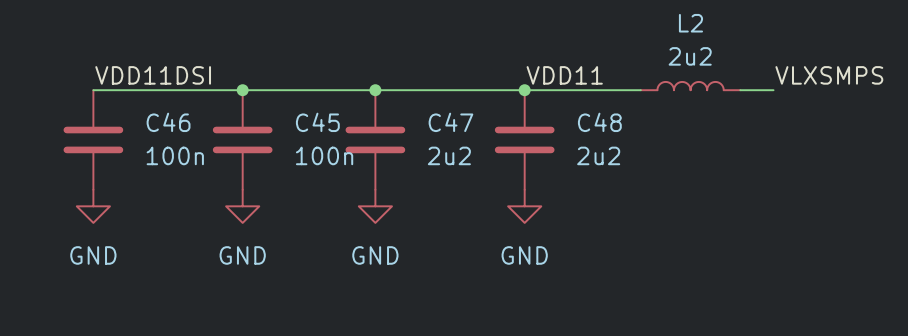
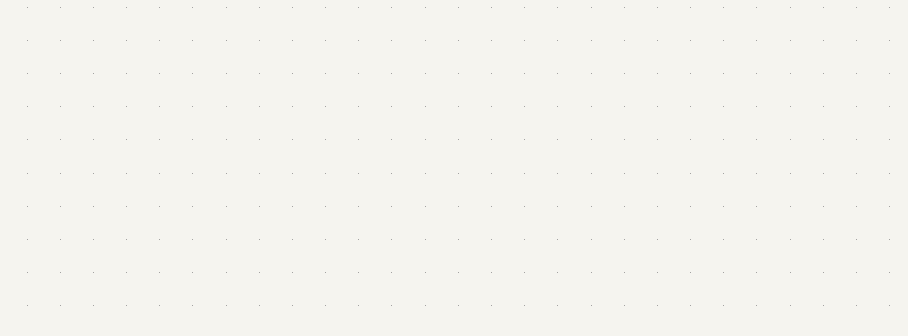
label: VDD11DSI (153, 75) -> none
label: VDD11 (564, 75) -> none
label: VLXSMPS (829, 75) -> none
L2: 2u2 (690, 86) -> none
wire: (93, 90) (640, 90) -> none
junction: (242, 90) -> none
junction: (375, 90) -> none
junction: (524, 90) -> none
wire: (740, 90) (773, 90) -> none
C46: 100n (93, 139) -> none
C45: 100n (242, 139) -> none
C47: 2u2 (375, 139) -> none
C48: 2u2 (524, 139) -> none
power symbol: GND (93, 206) -> none
power symbol: GND (242, 206) -> none
power symbol: GND (375, 206) -> none
power symbol: GND (524, 206) -> none

